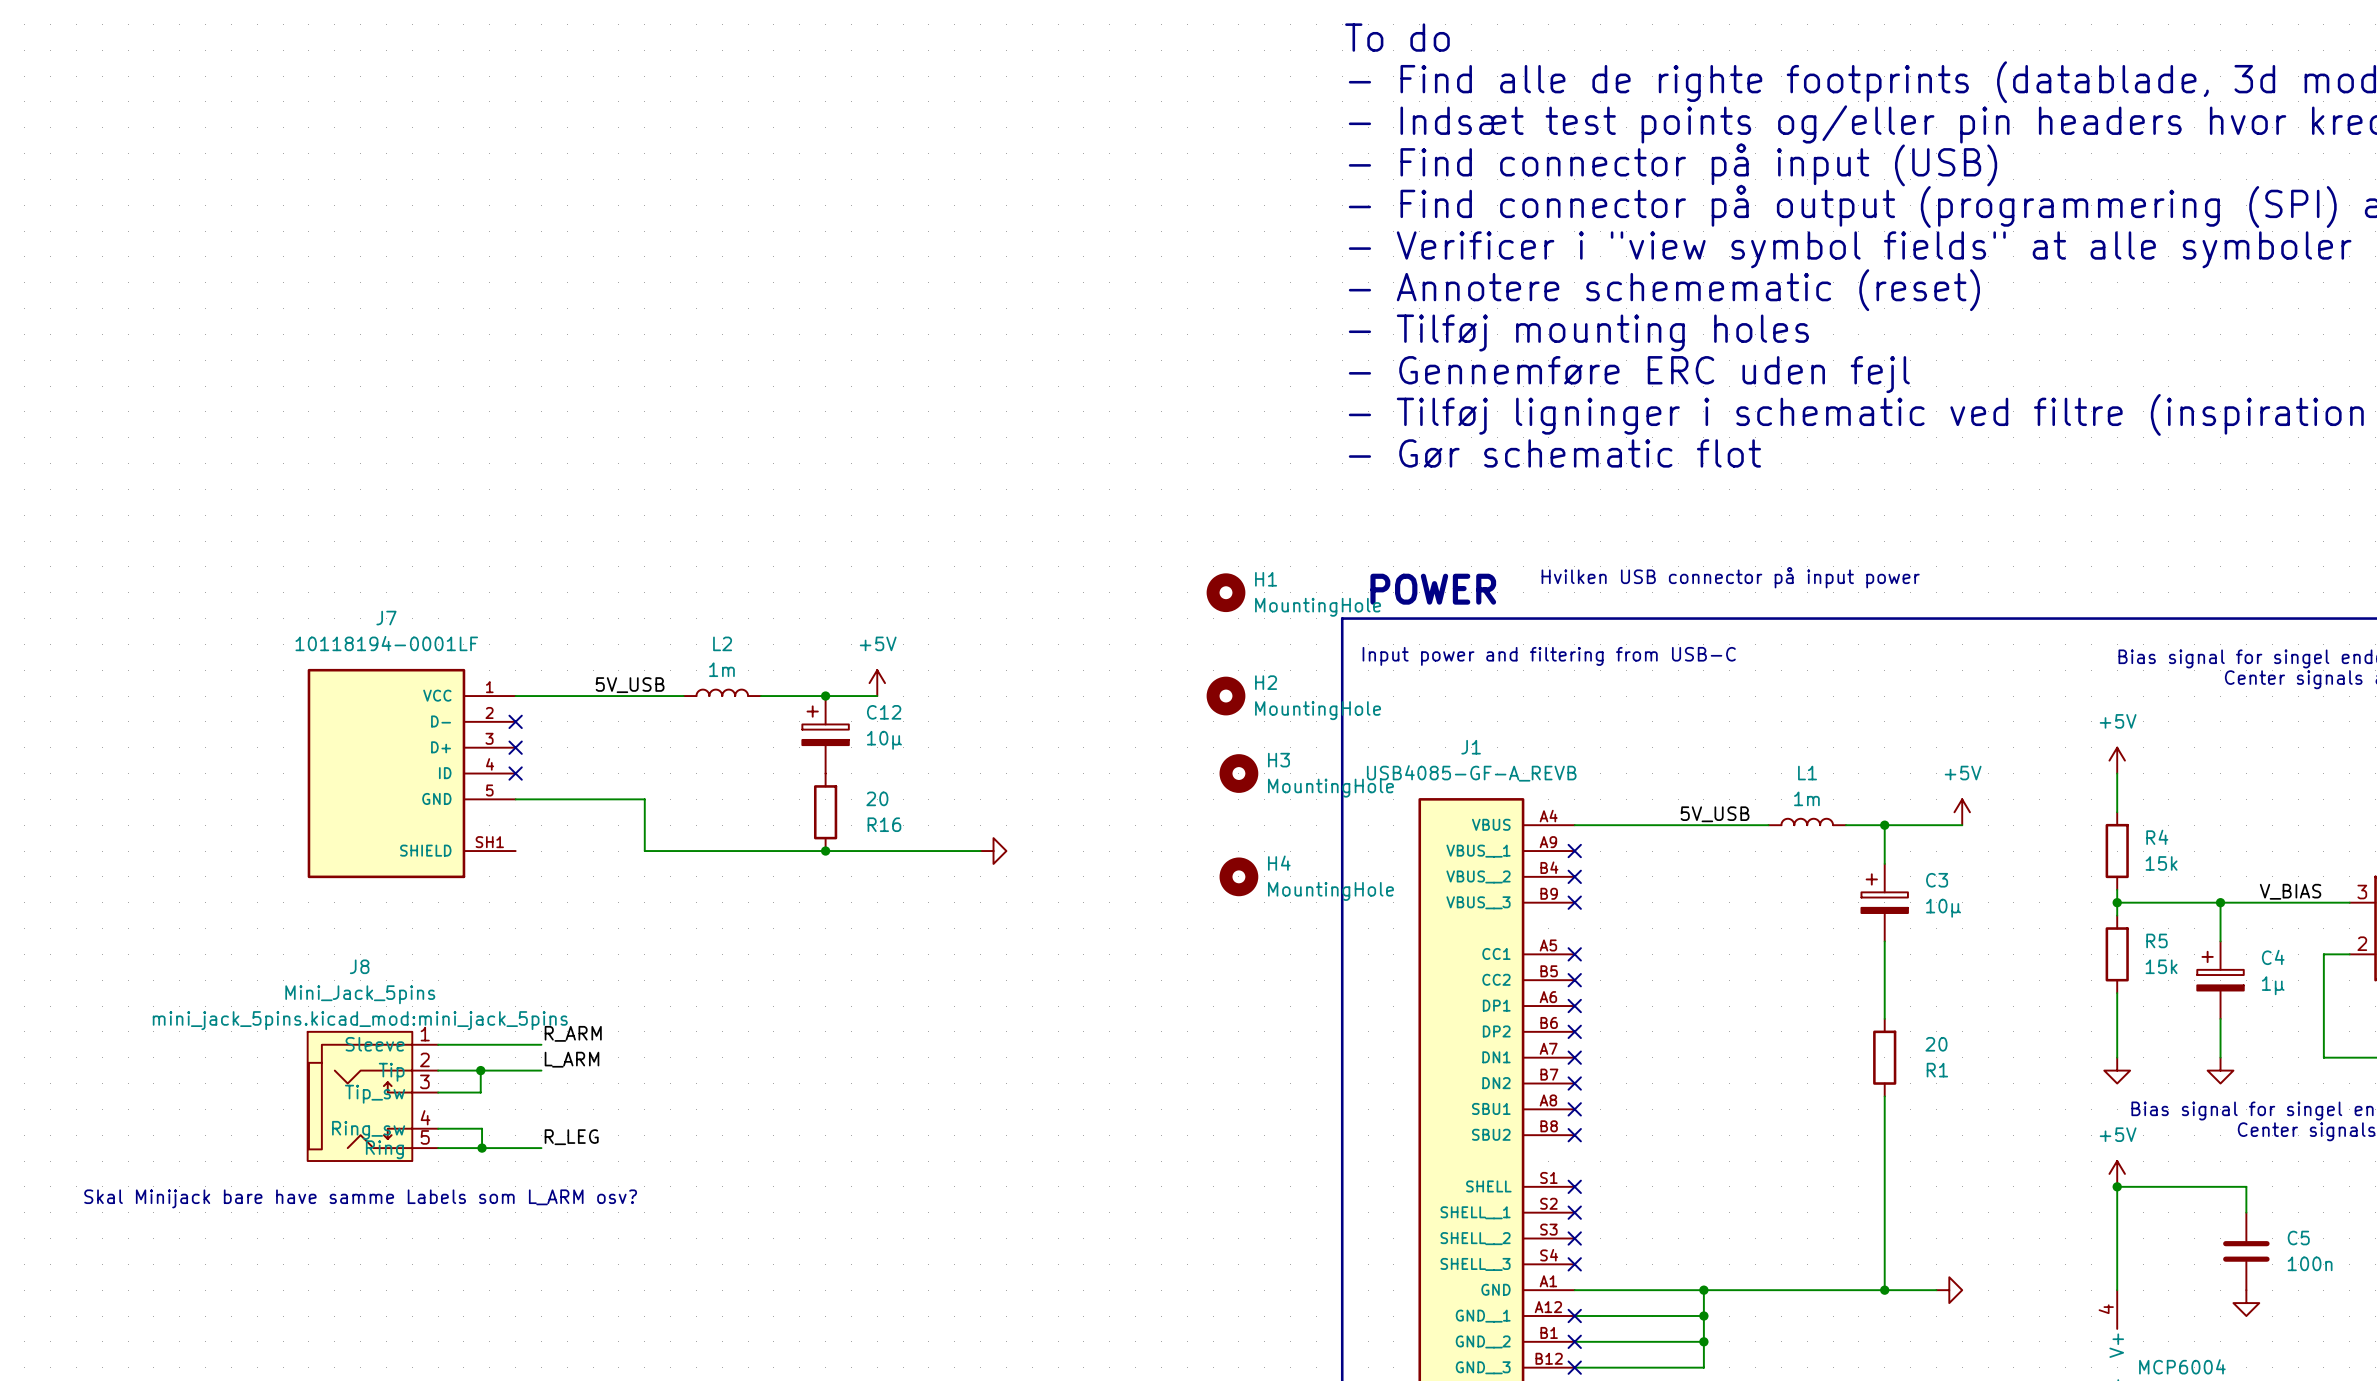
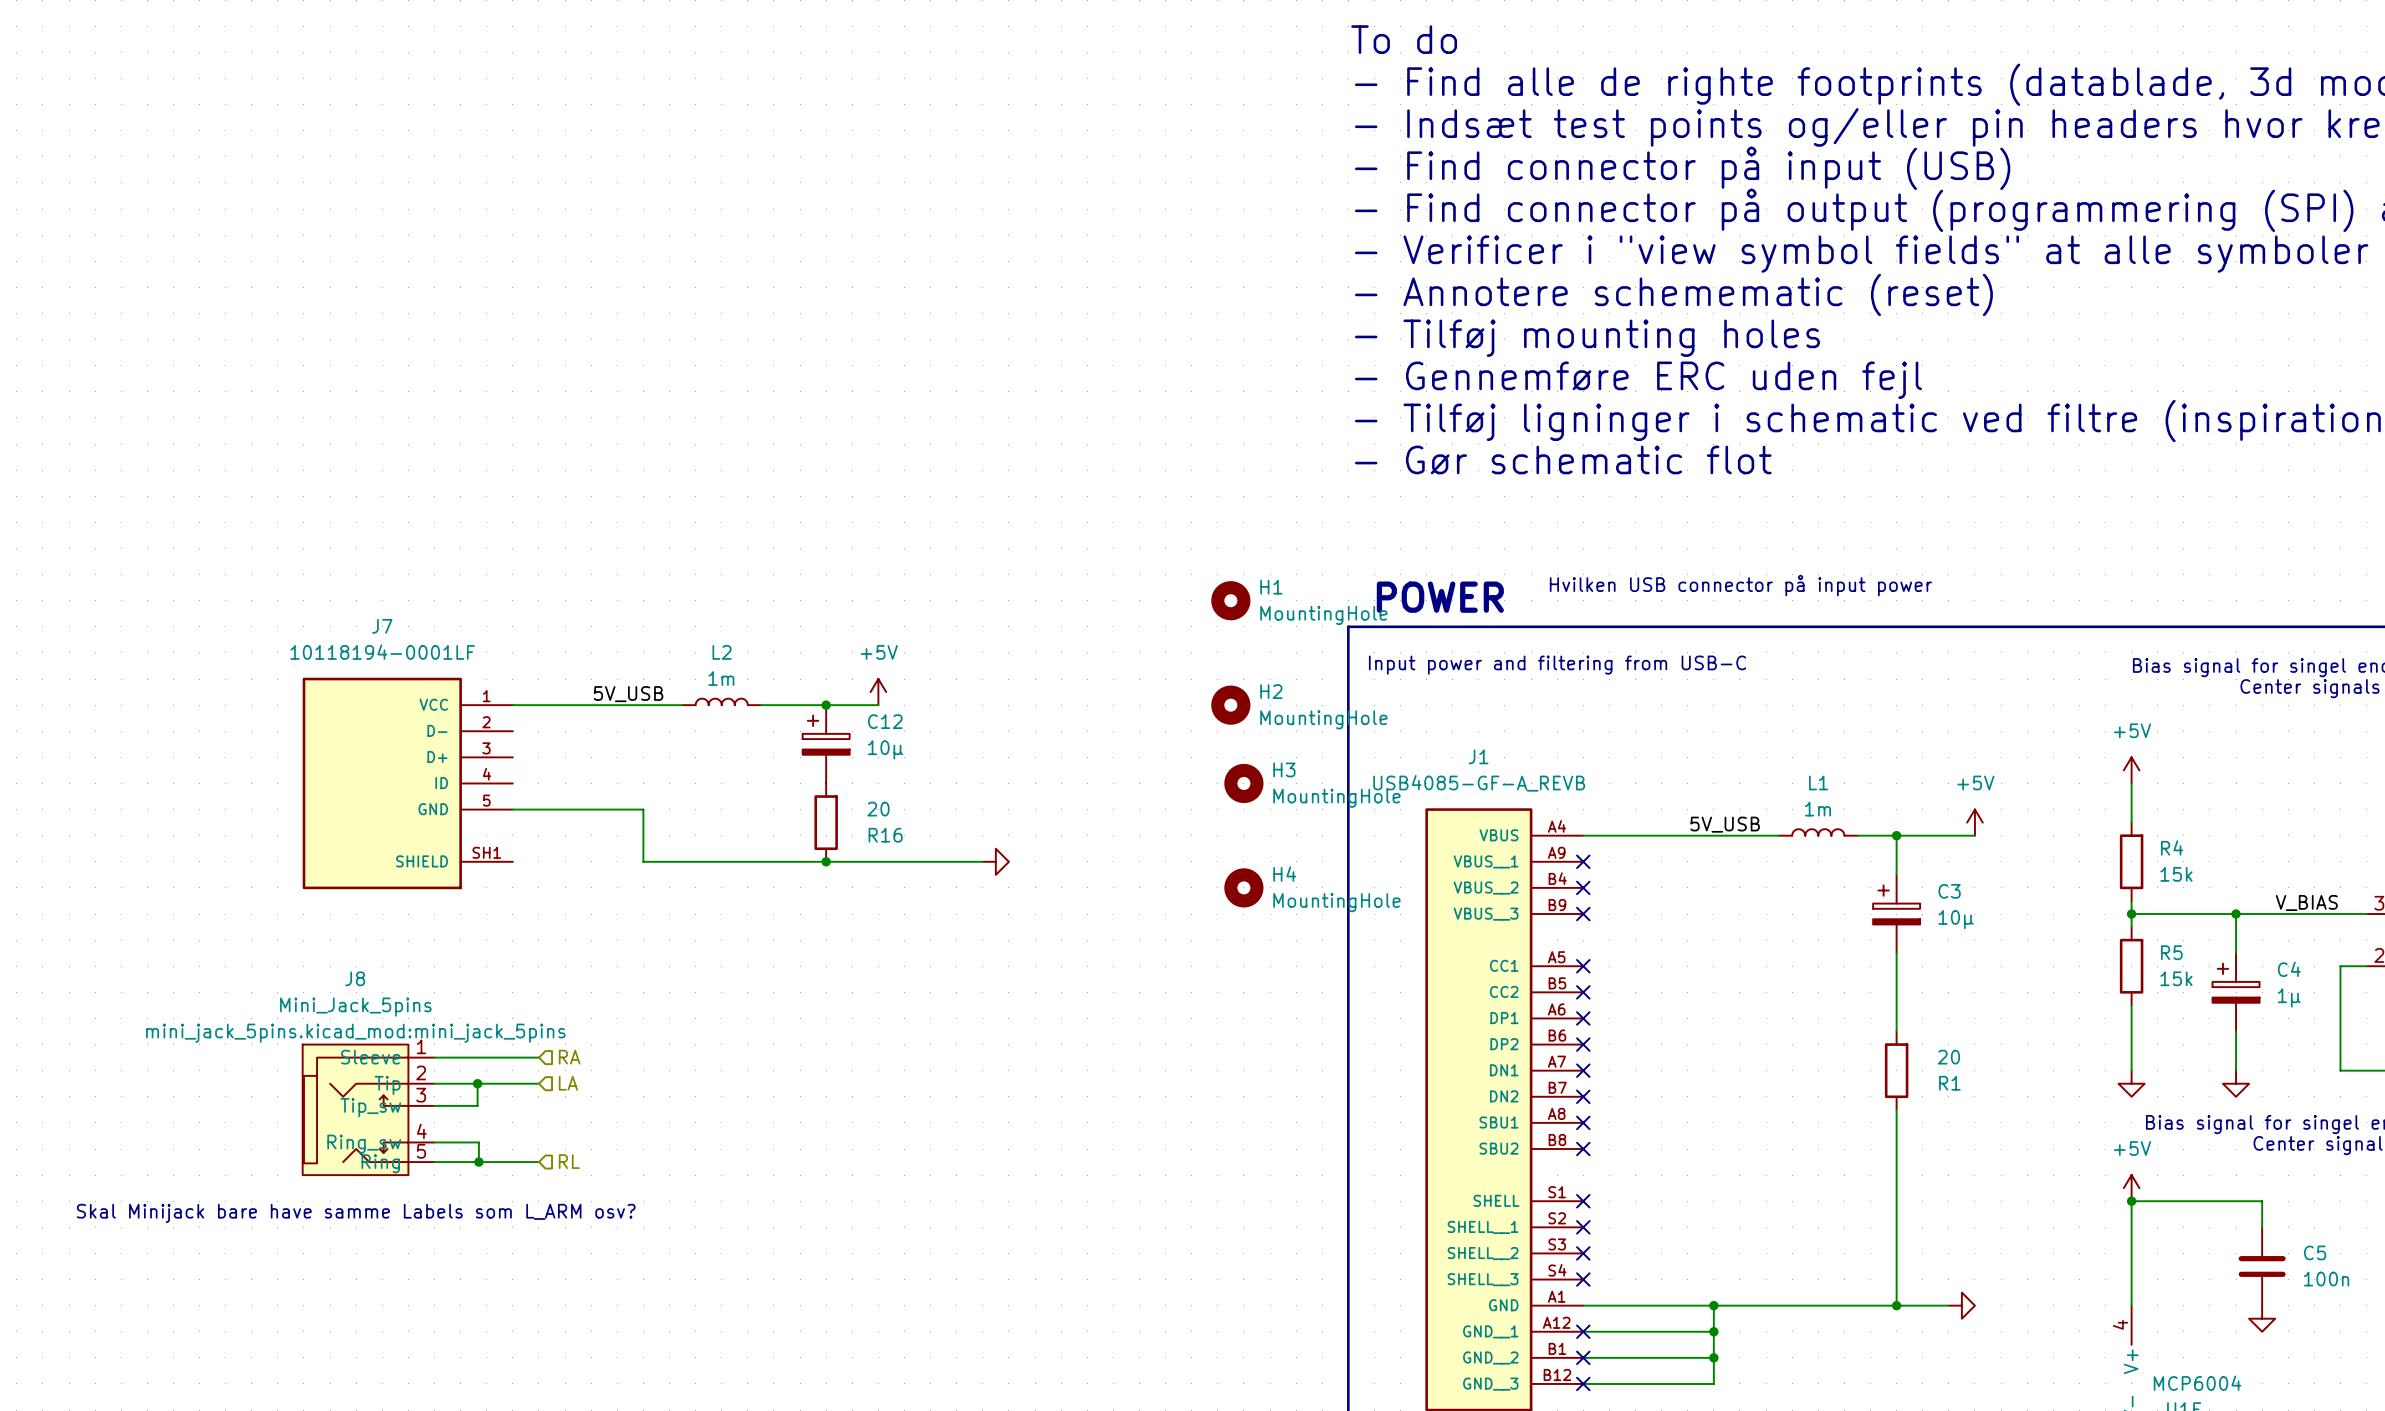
no-connect mark: (515, 721) -> none
no-connect mark: (515, 747) -> none
no-connect mark: (515, 773) -> none
label: R_ARM (573, 1033) -> none
hierarchical label: none -> RA (569, 1057)
label: L_ARM (571, 1059) -> none
hierarchical label: none -> LA (568, 1083)
label: R_LEG (571, 1137) -> none
hierarchical label: none -> RL (569, 1161)

